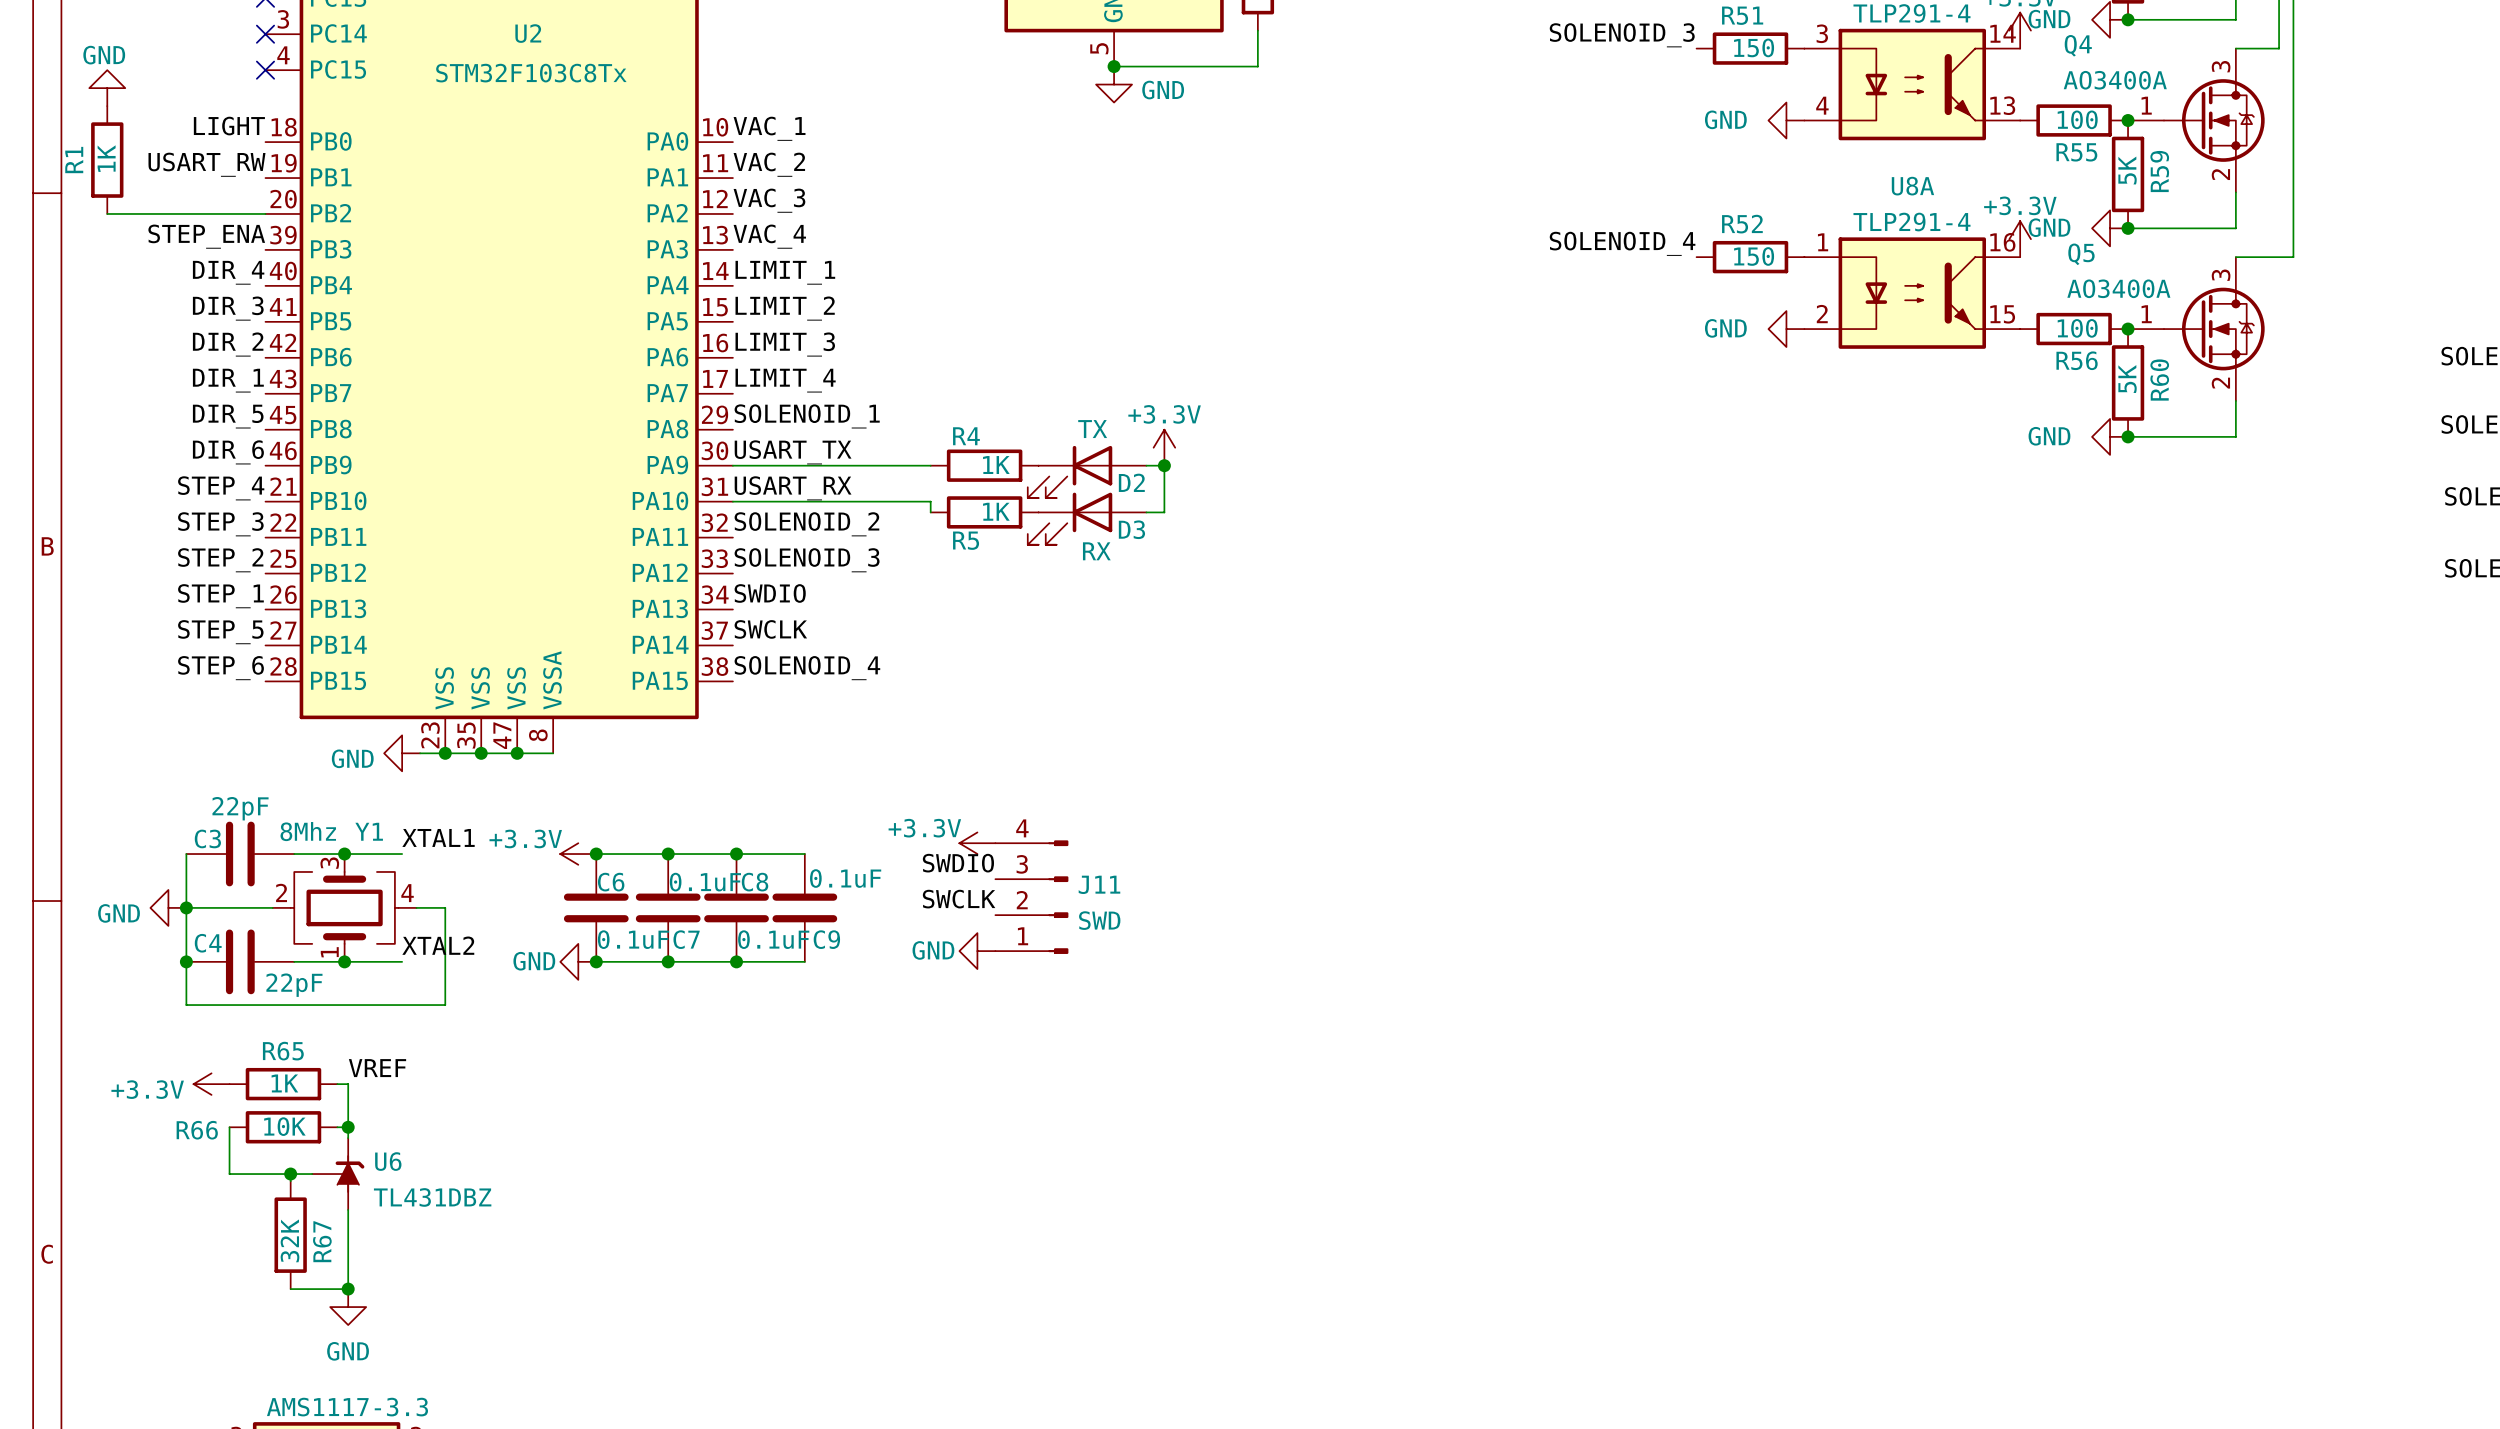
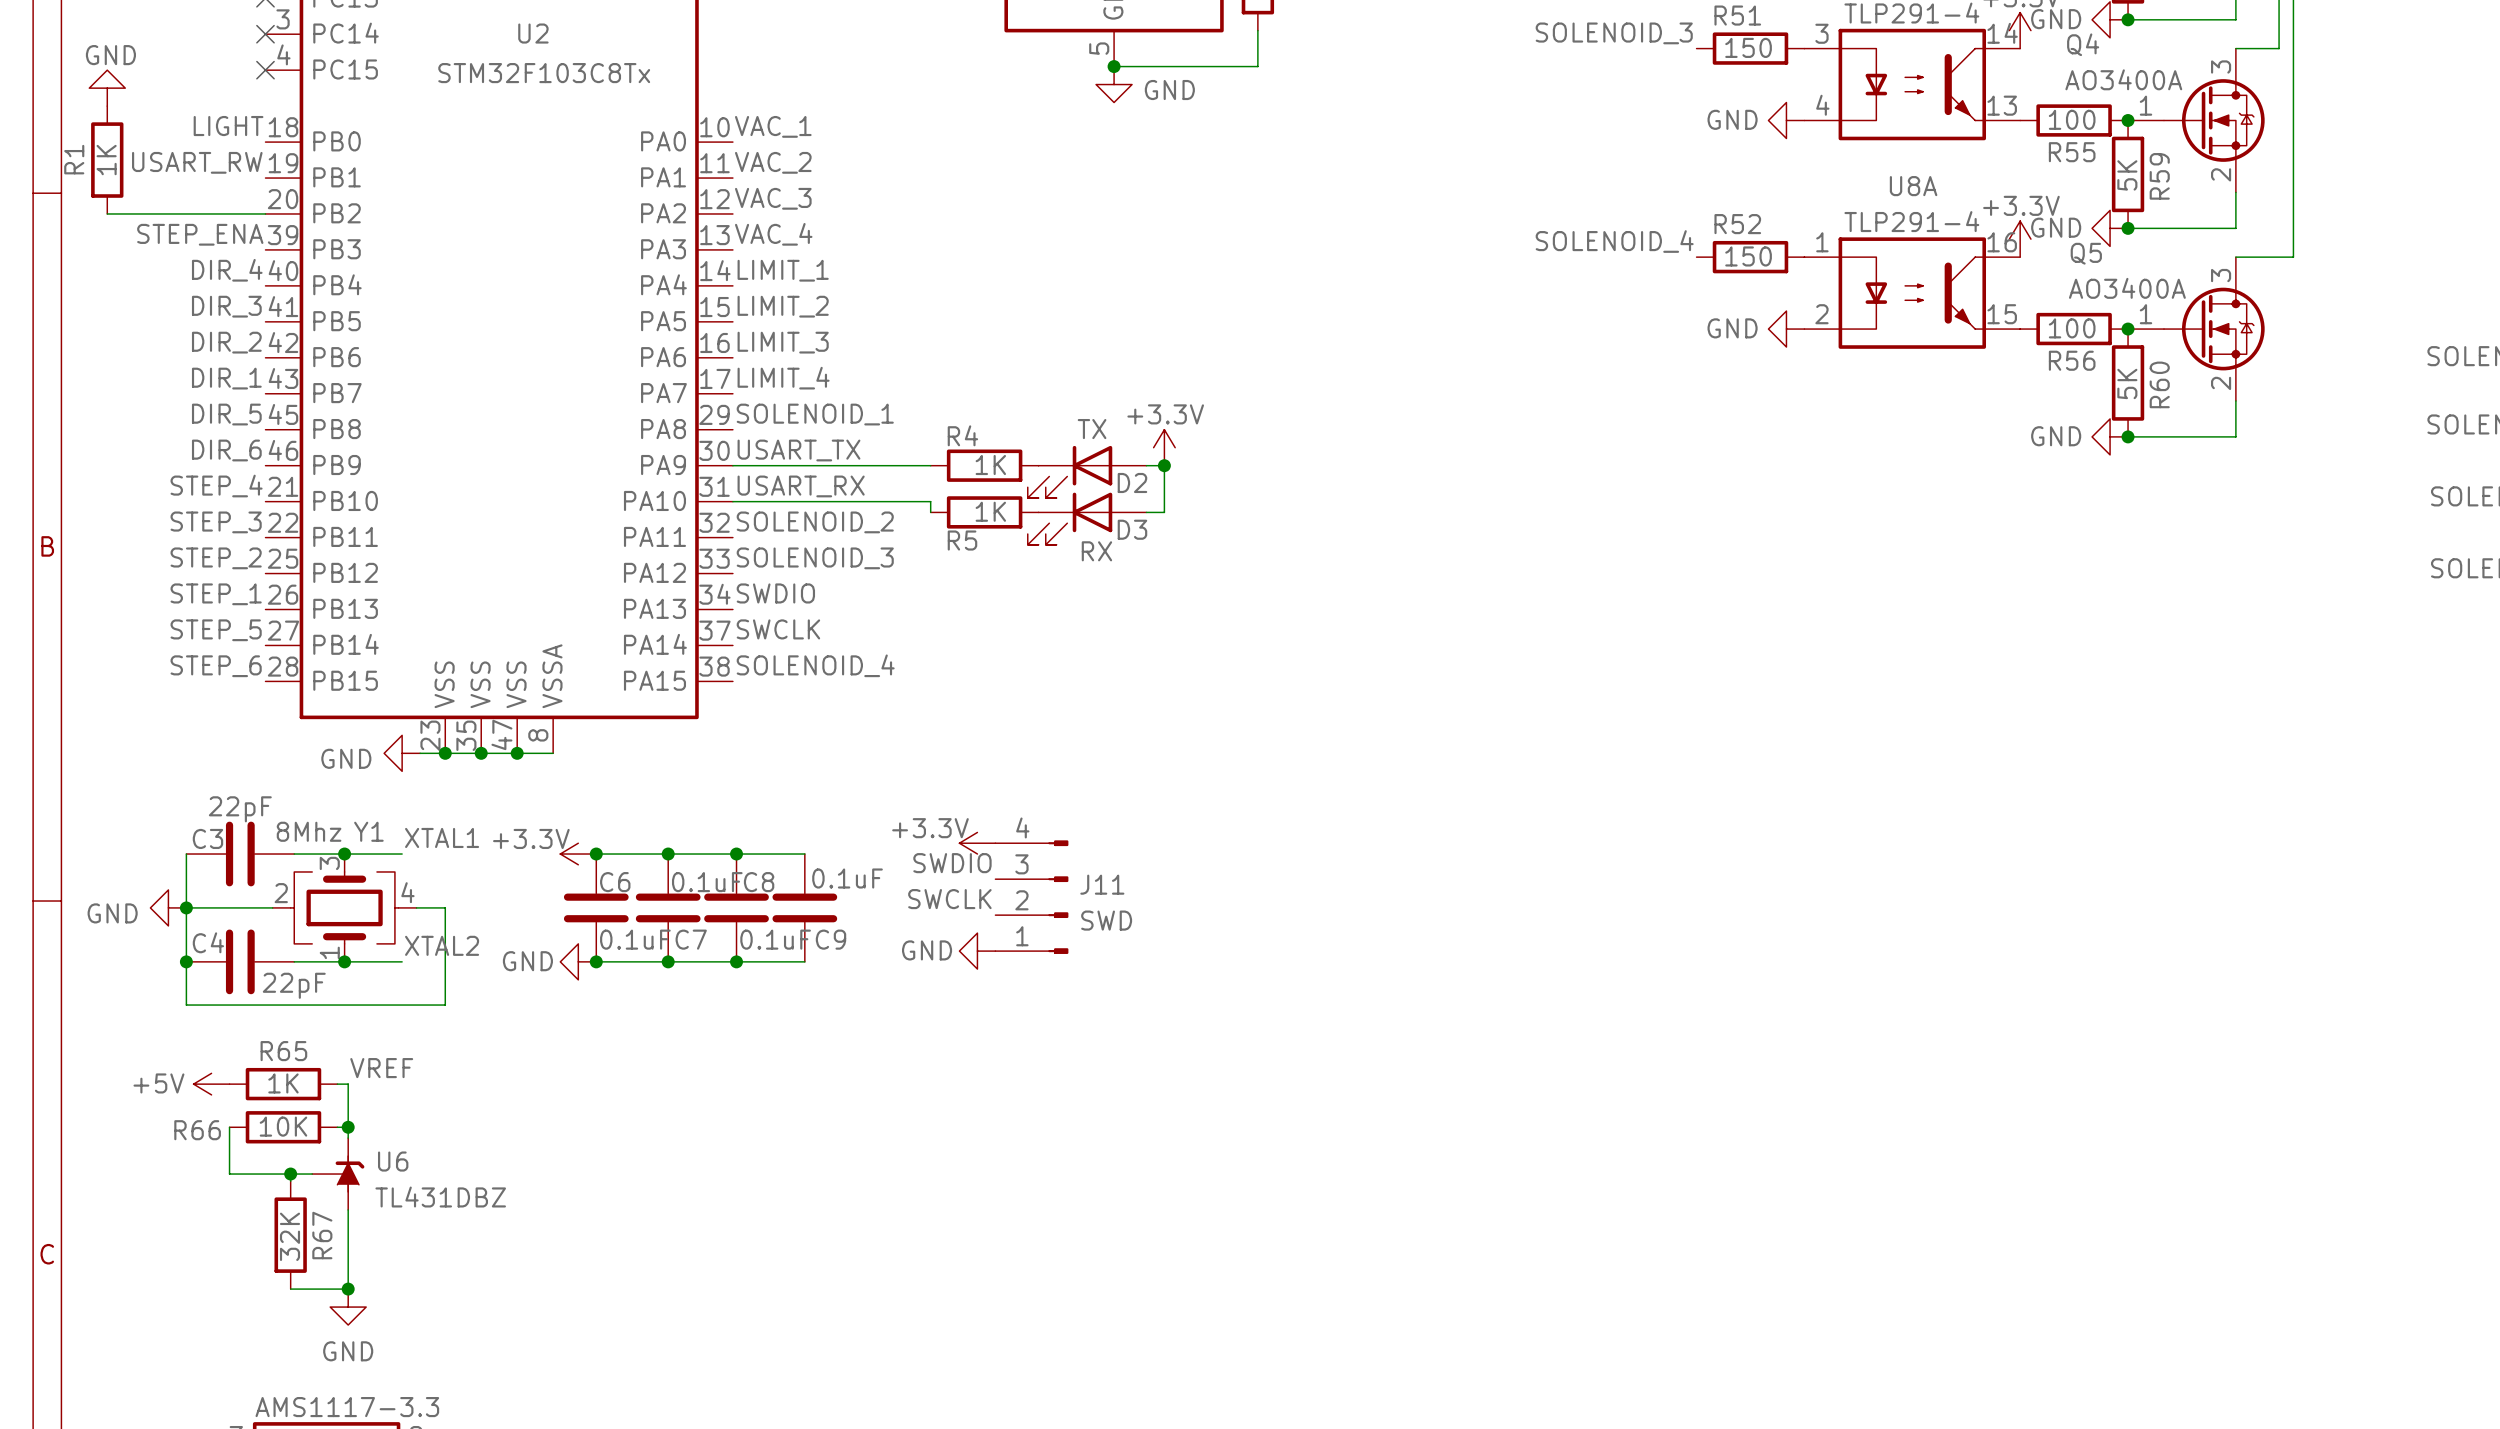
power symbol: +3.3V (211, 1084) -> +5V (211, 1084)

